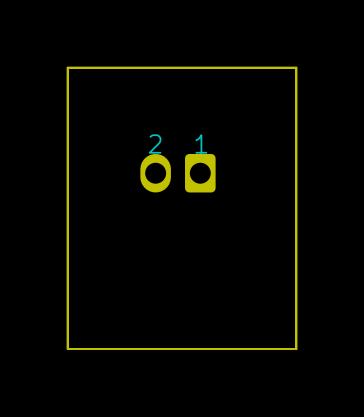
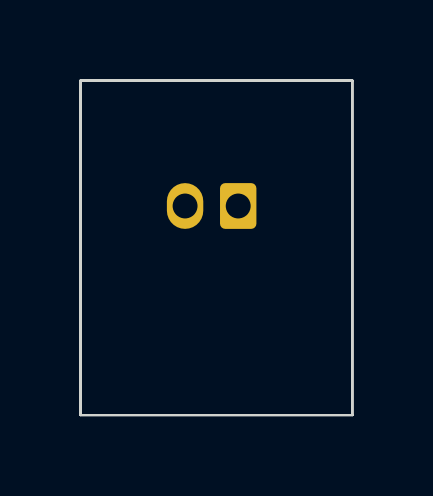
part text: 2 (155, 143) -> none
part text: 1 (201, 143) -> none

